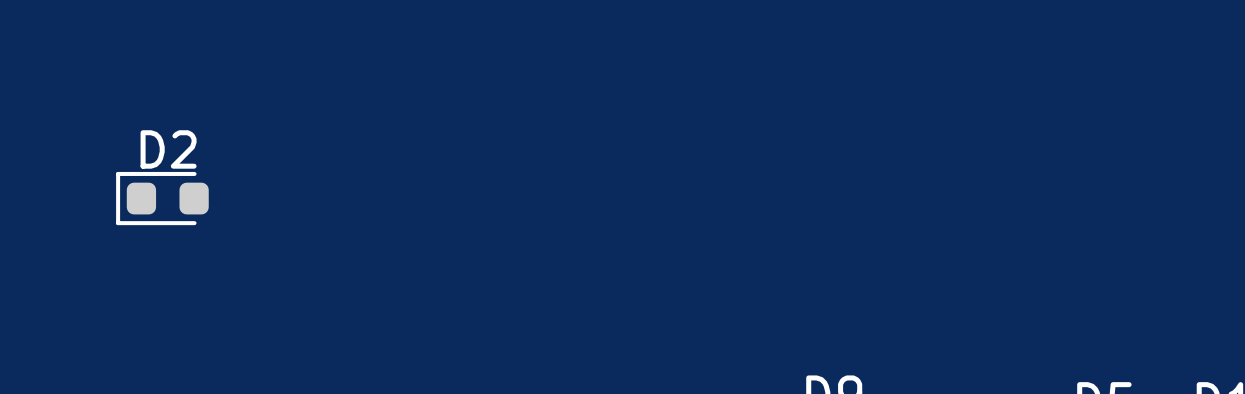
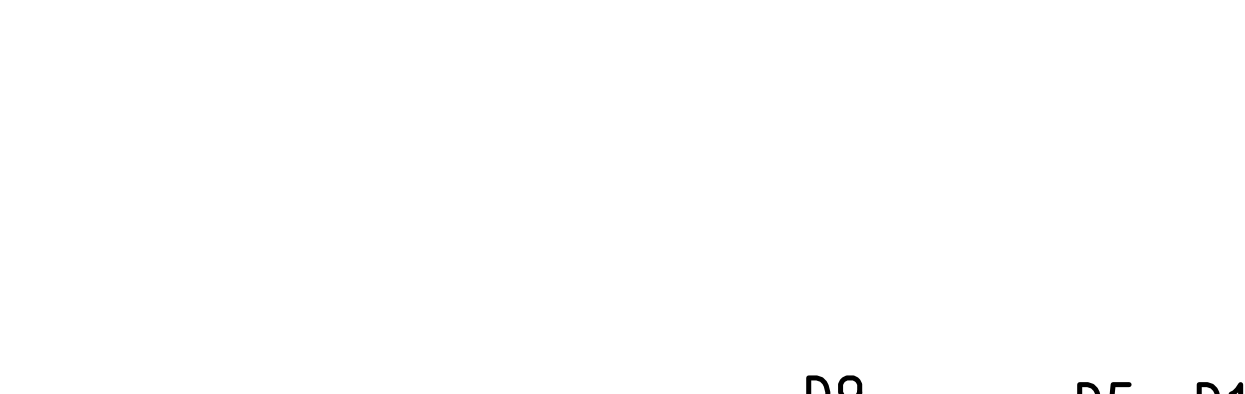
D2: (162, 198) -> none

